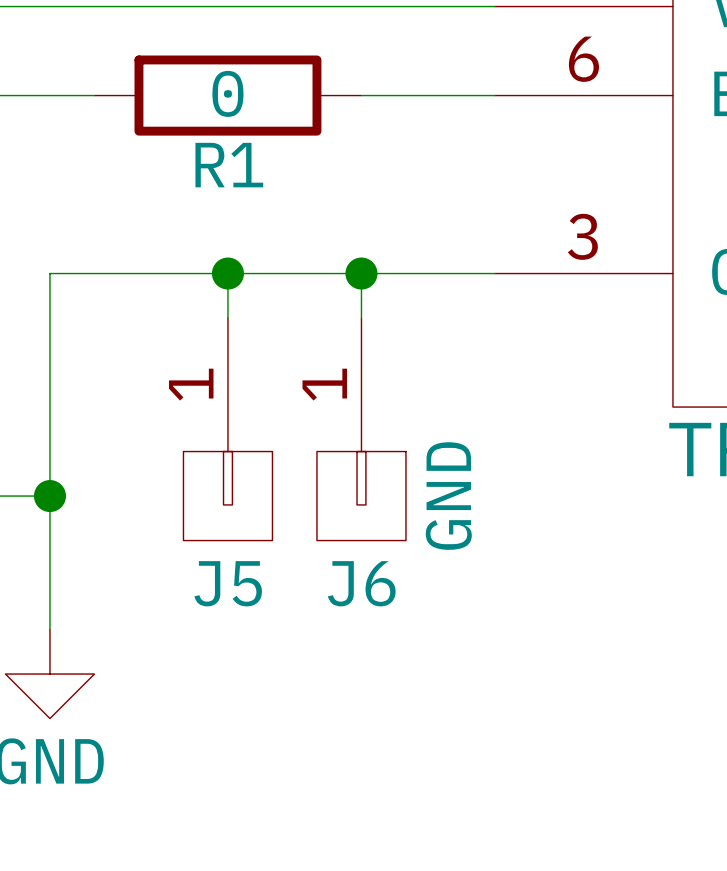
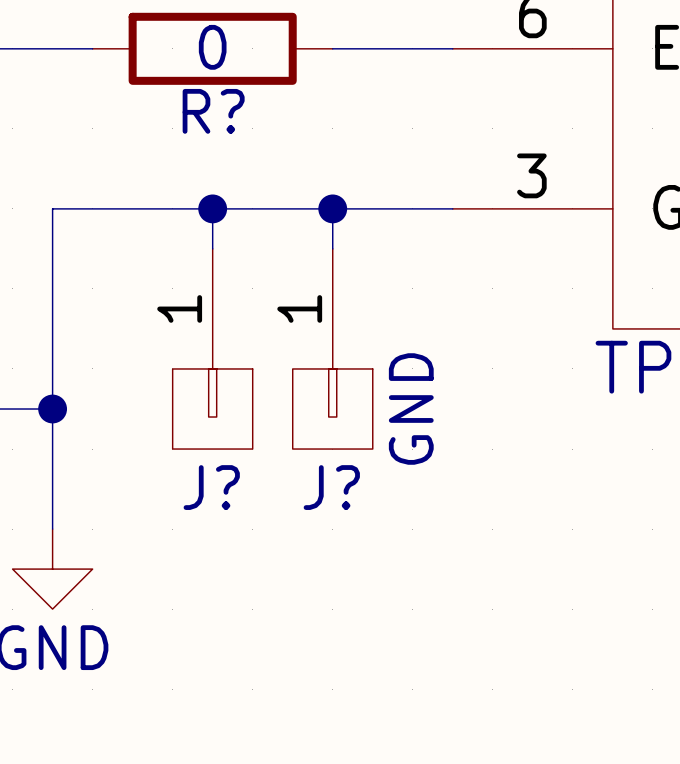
R1 name: R1 (229, 165) -> R? (213, 111)
J5 name: J5 (228, 583) -> J? (211, 487)
J6 name: J6 (361, 583) -> J? (331, 487)

